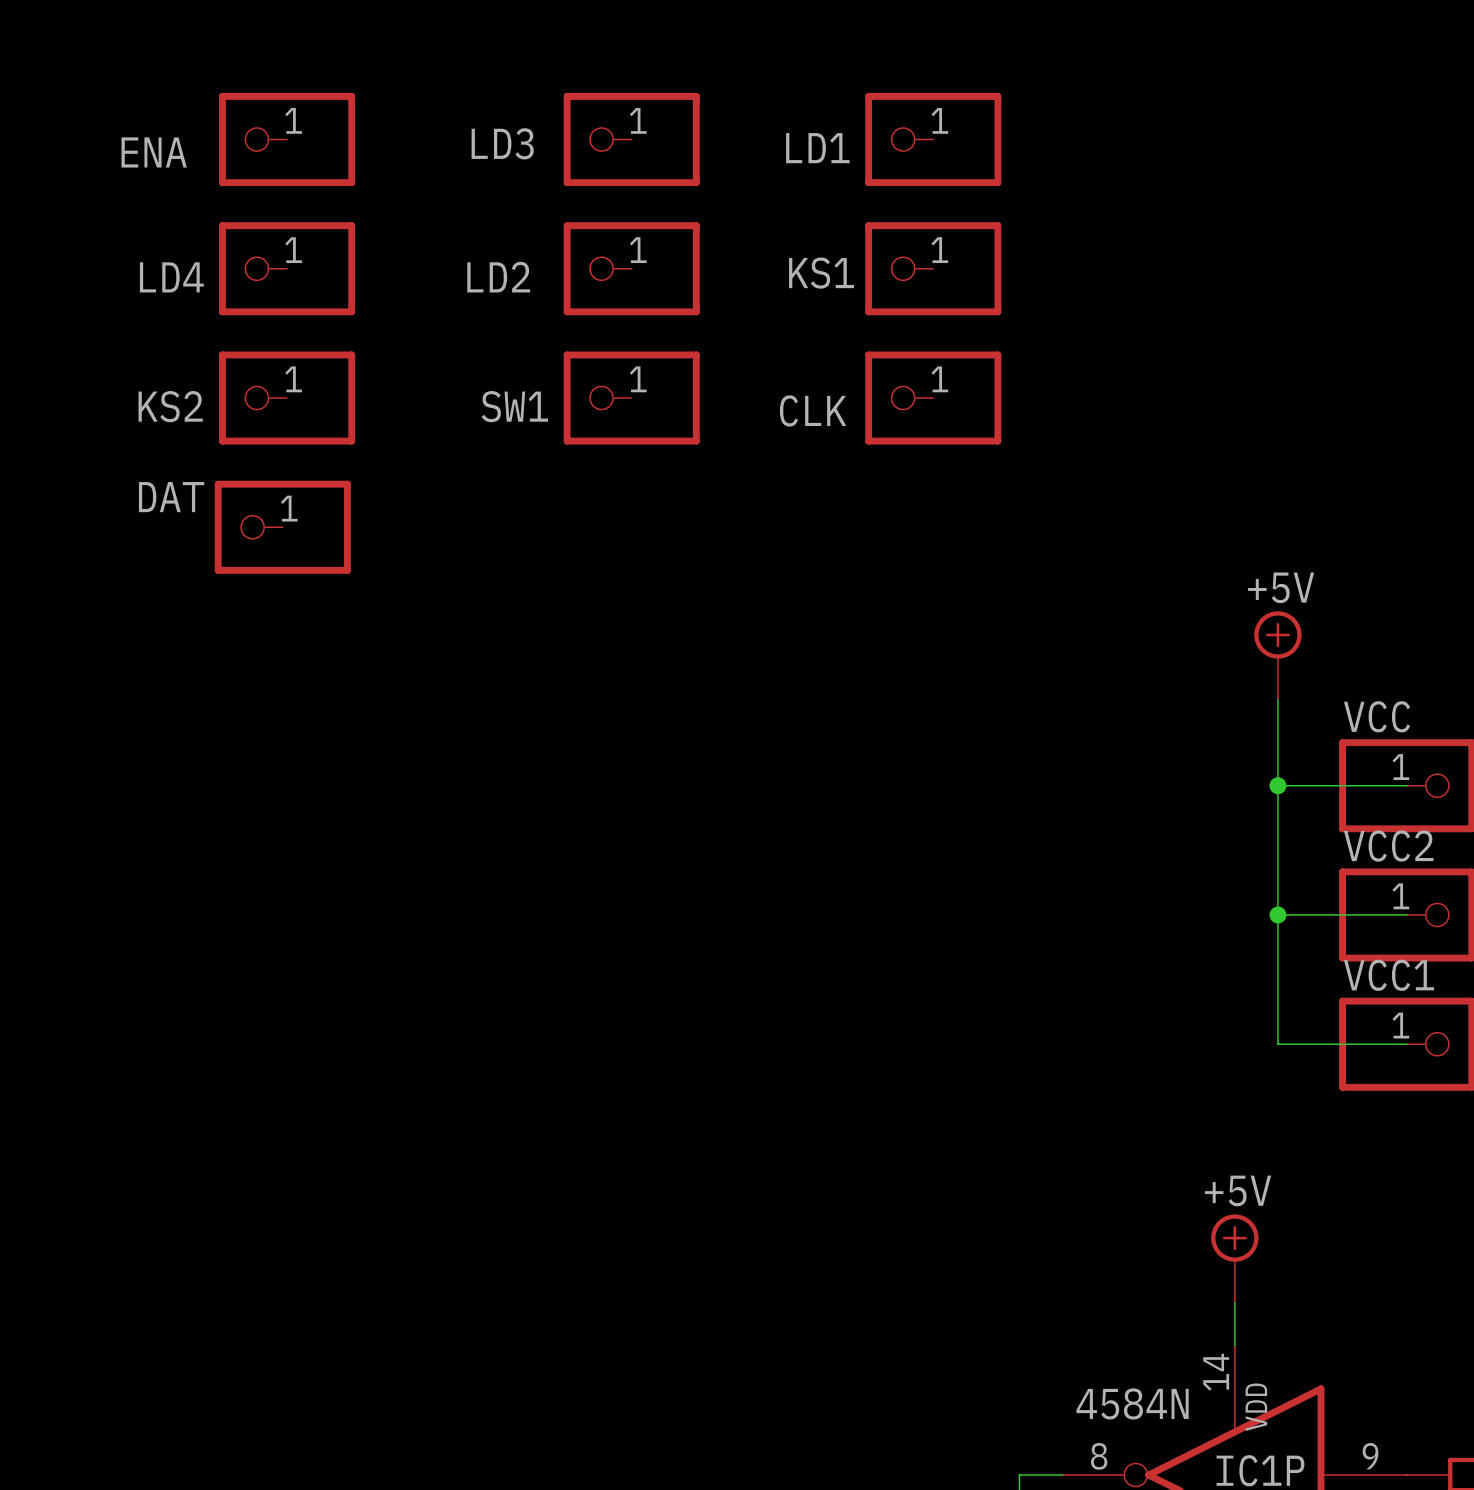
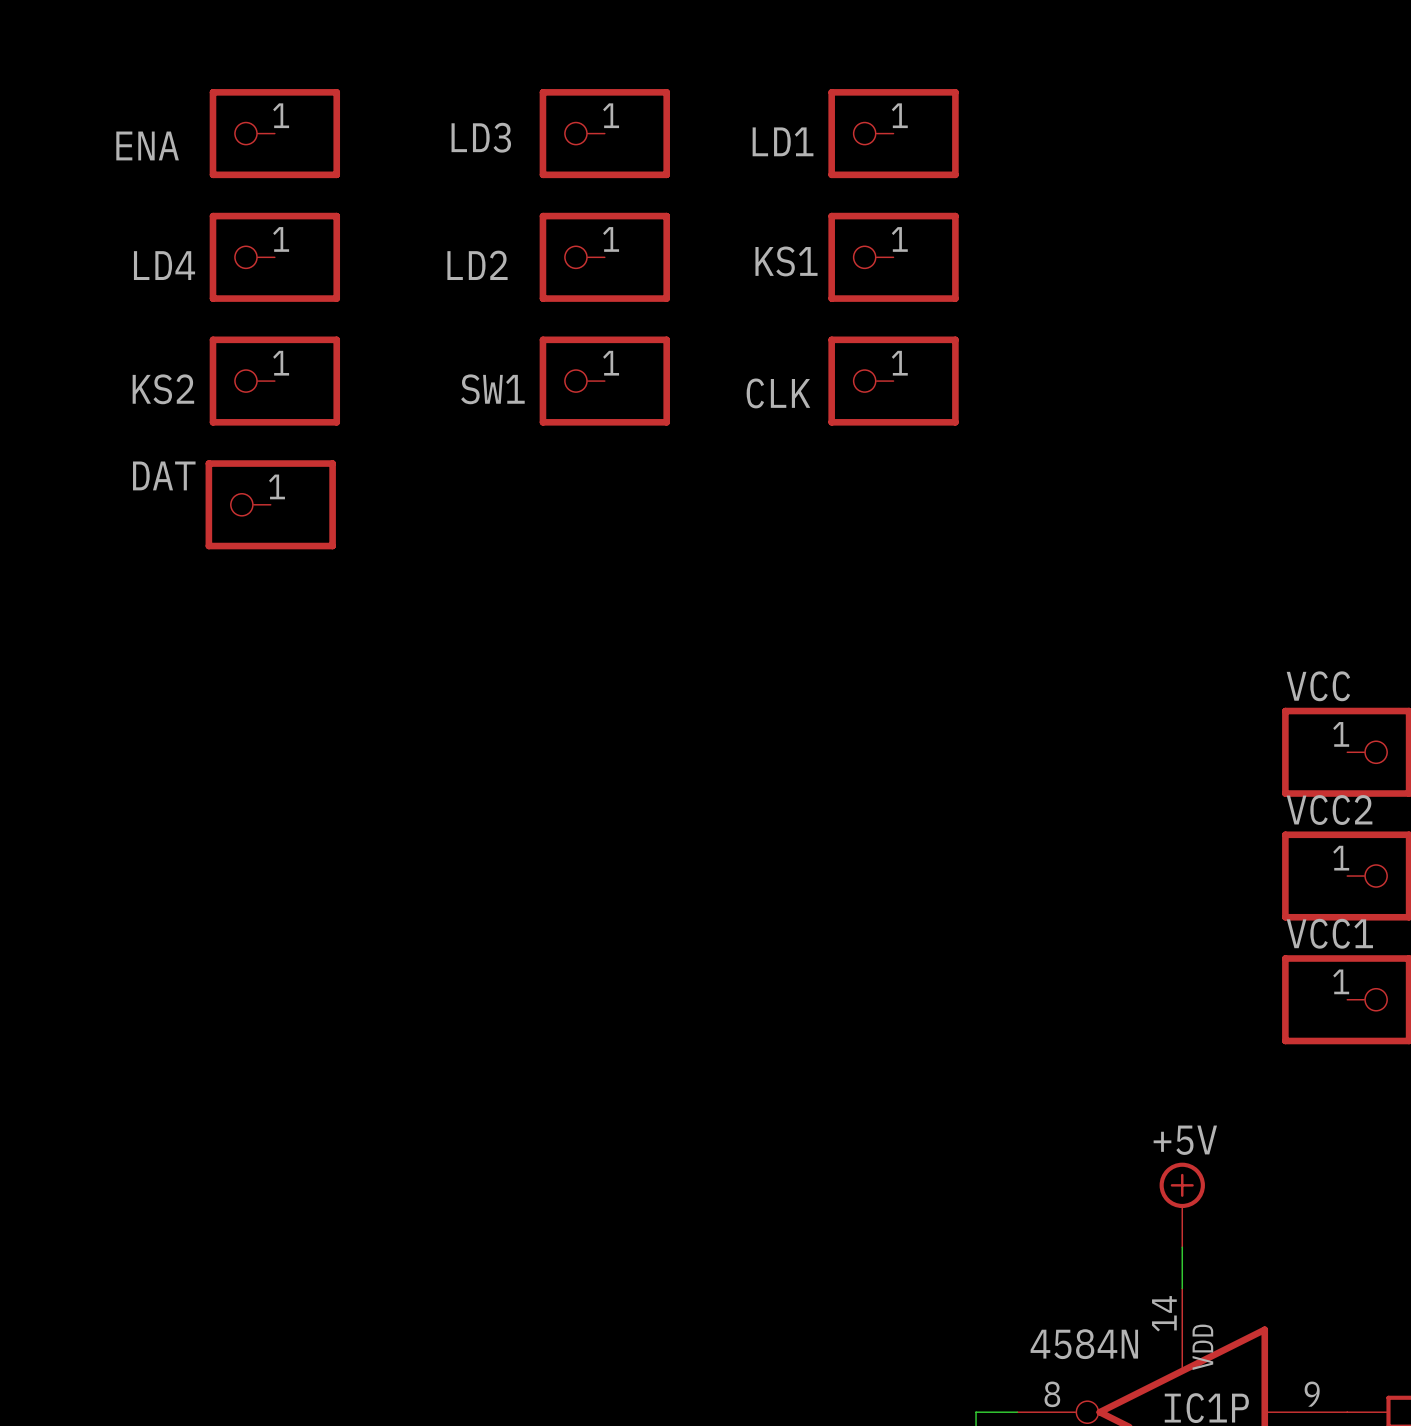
power symbol: +5V (1277, 655) -> none
wire: (1277, 699) (1277, 1044) (1407, 1044) -> none
wire: (1277, 785) (1407, 785) -> none
junction: (1277, 785) -> none
wire: (1277, 914) (1407, 914) -> none
junction: (1277, 914) -> none

